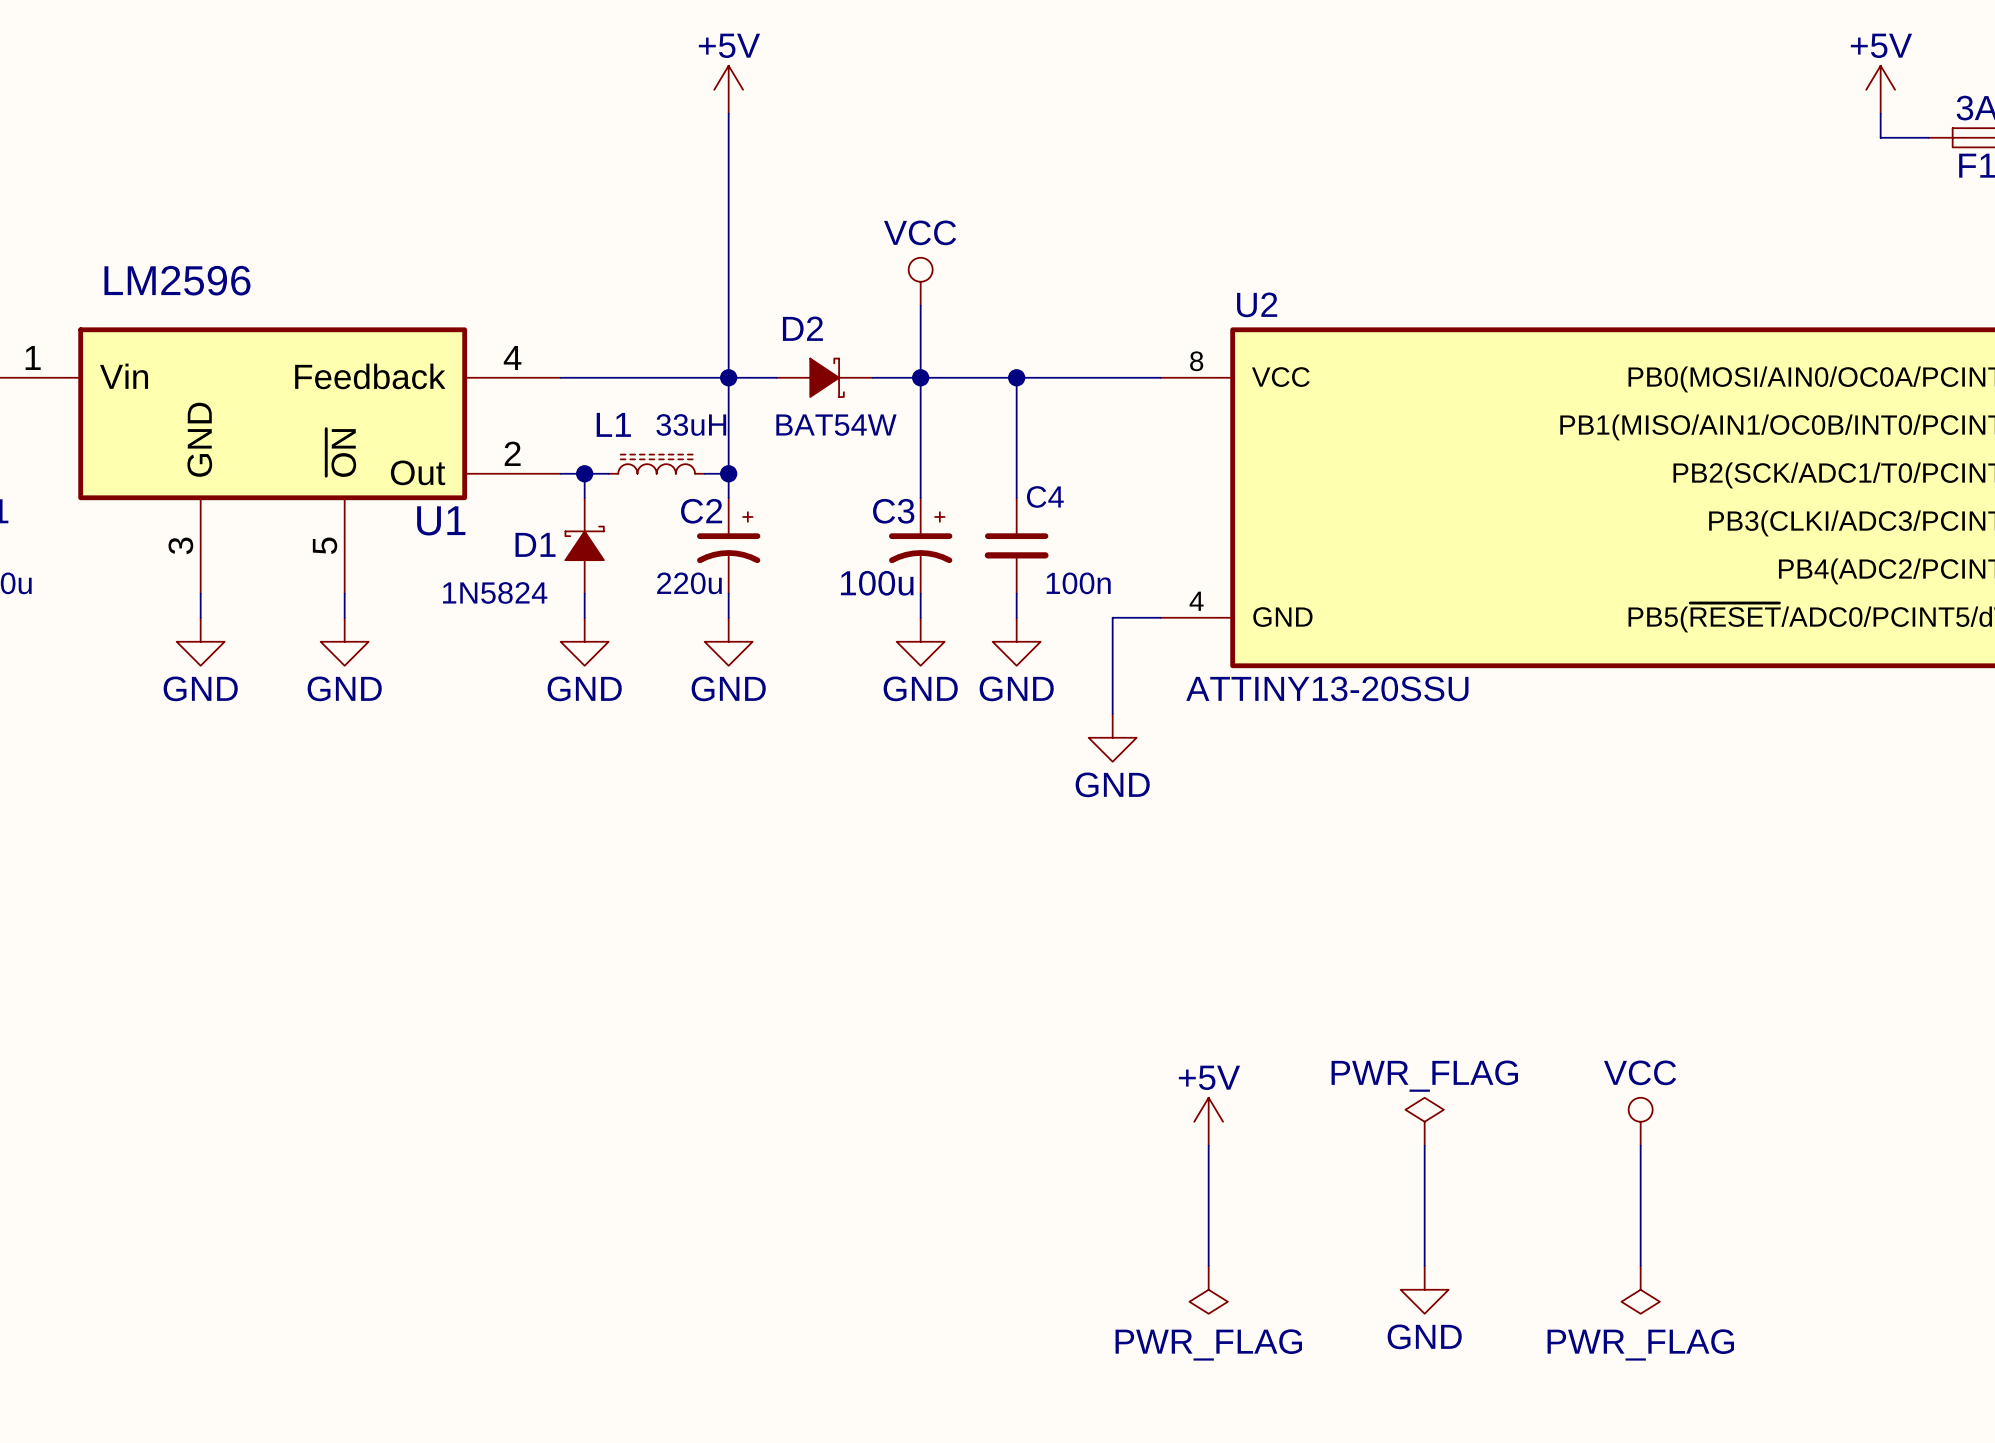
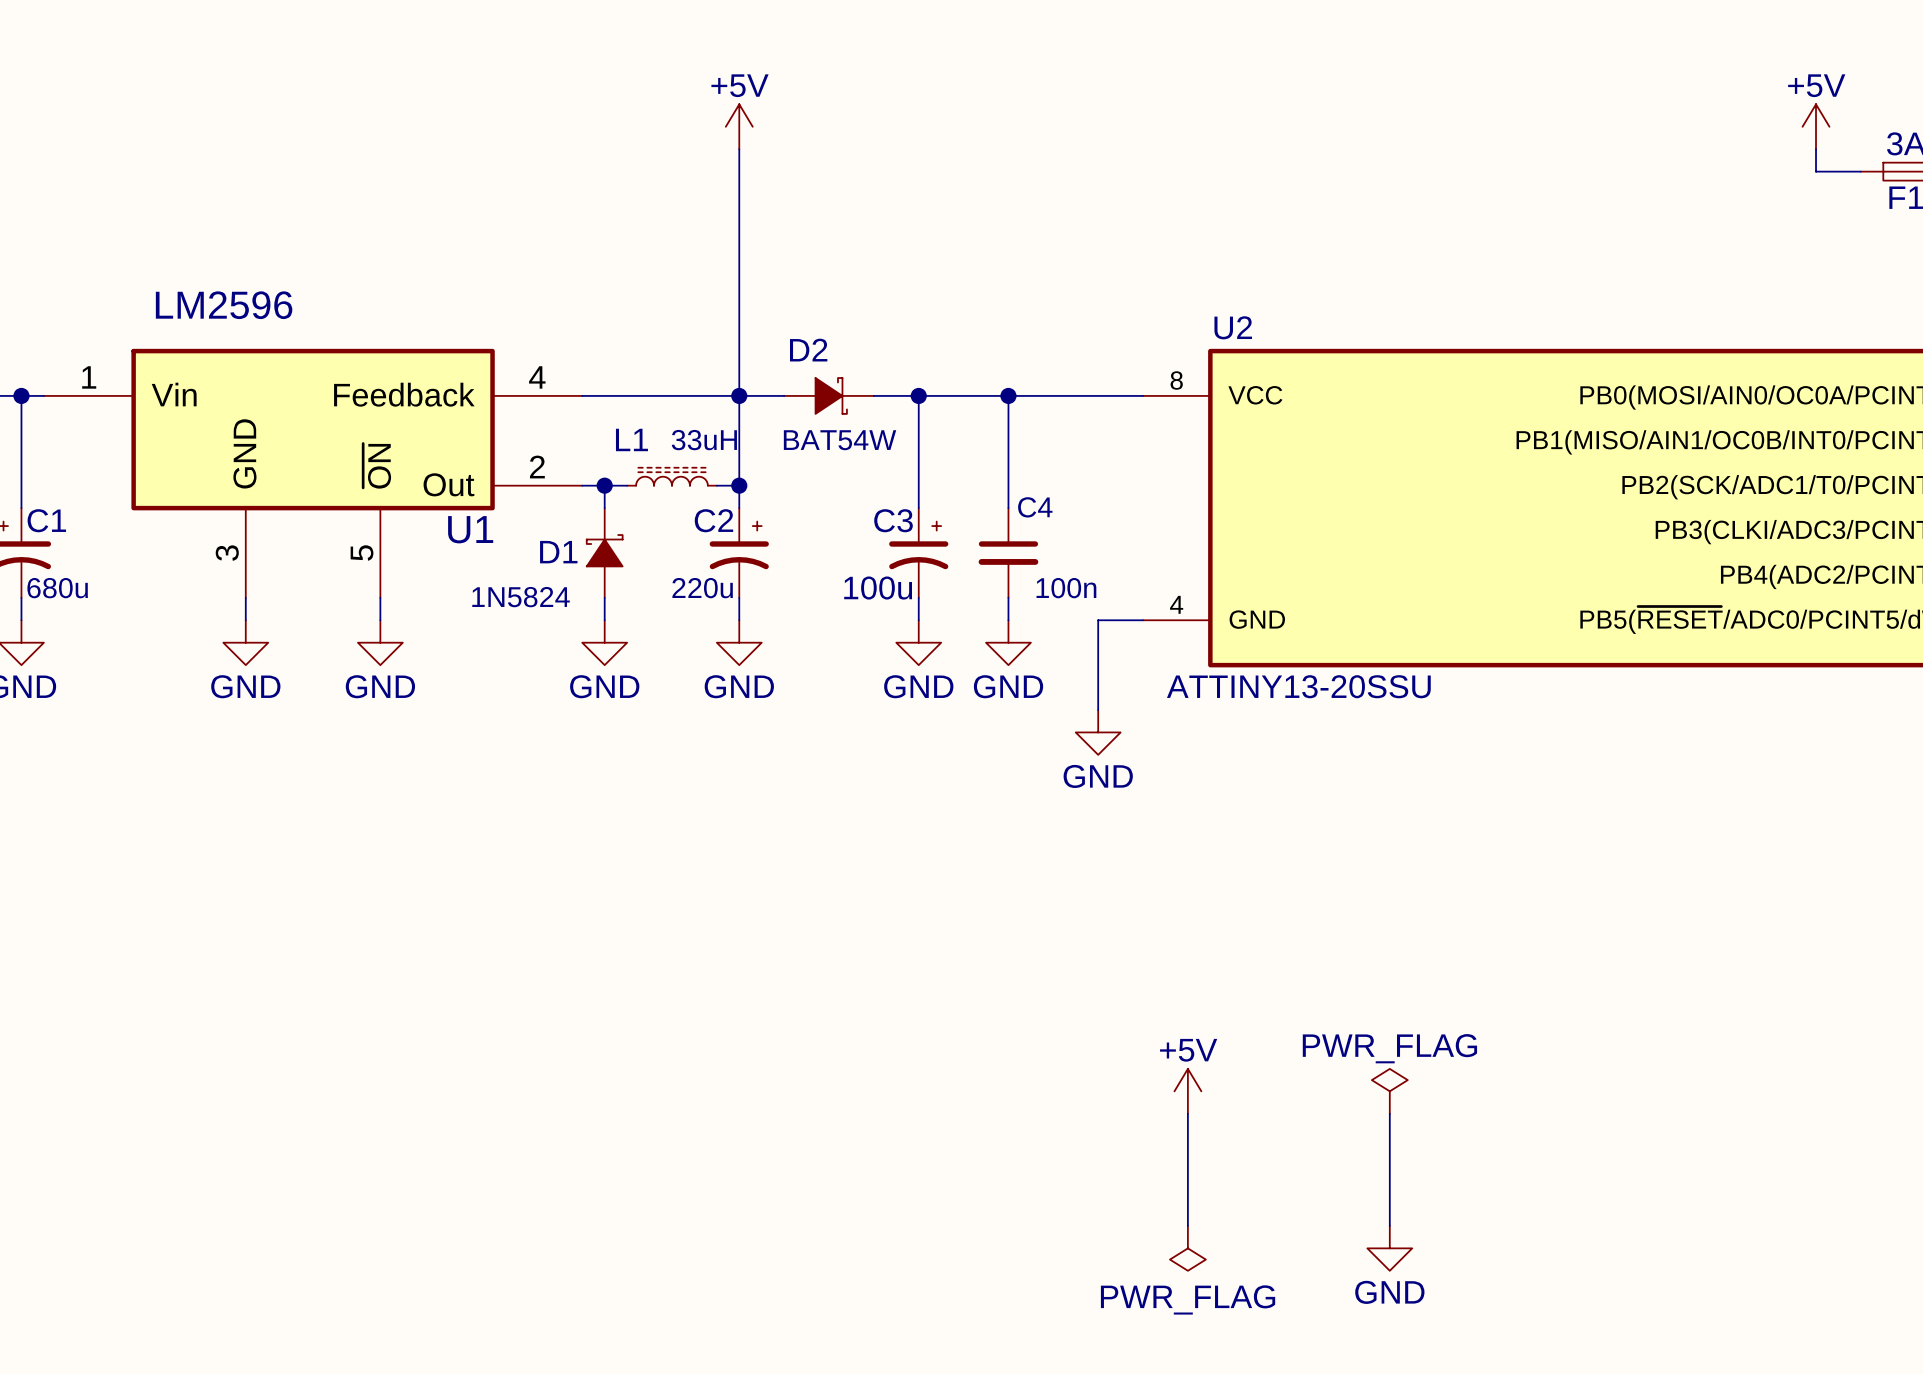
power symbol: VCC (920, 281) -> none
wire: (920, 305) (920, 377) -> none
power symbol: VCC (1640, 1121) -> none
wire: (1640, 1145) (1640, 1265) -> none
power symbol: PWR_FLAG (1640, 1289) -> none

